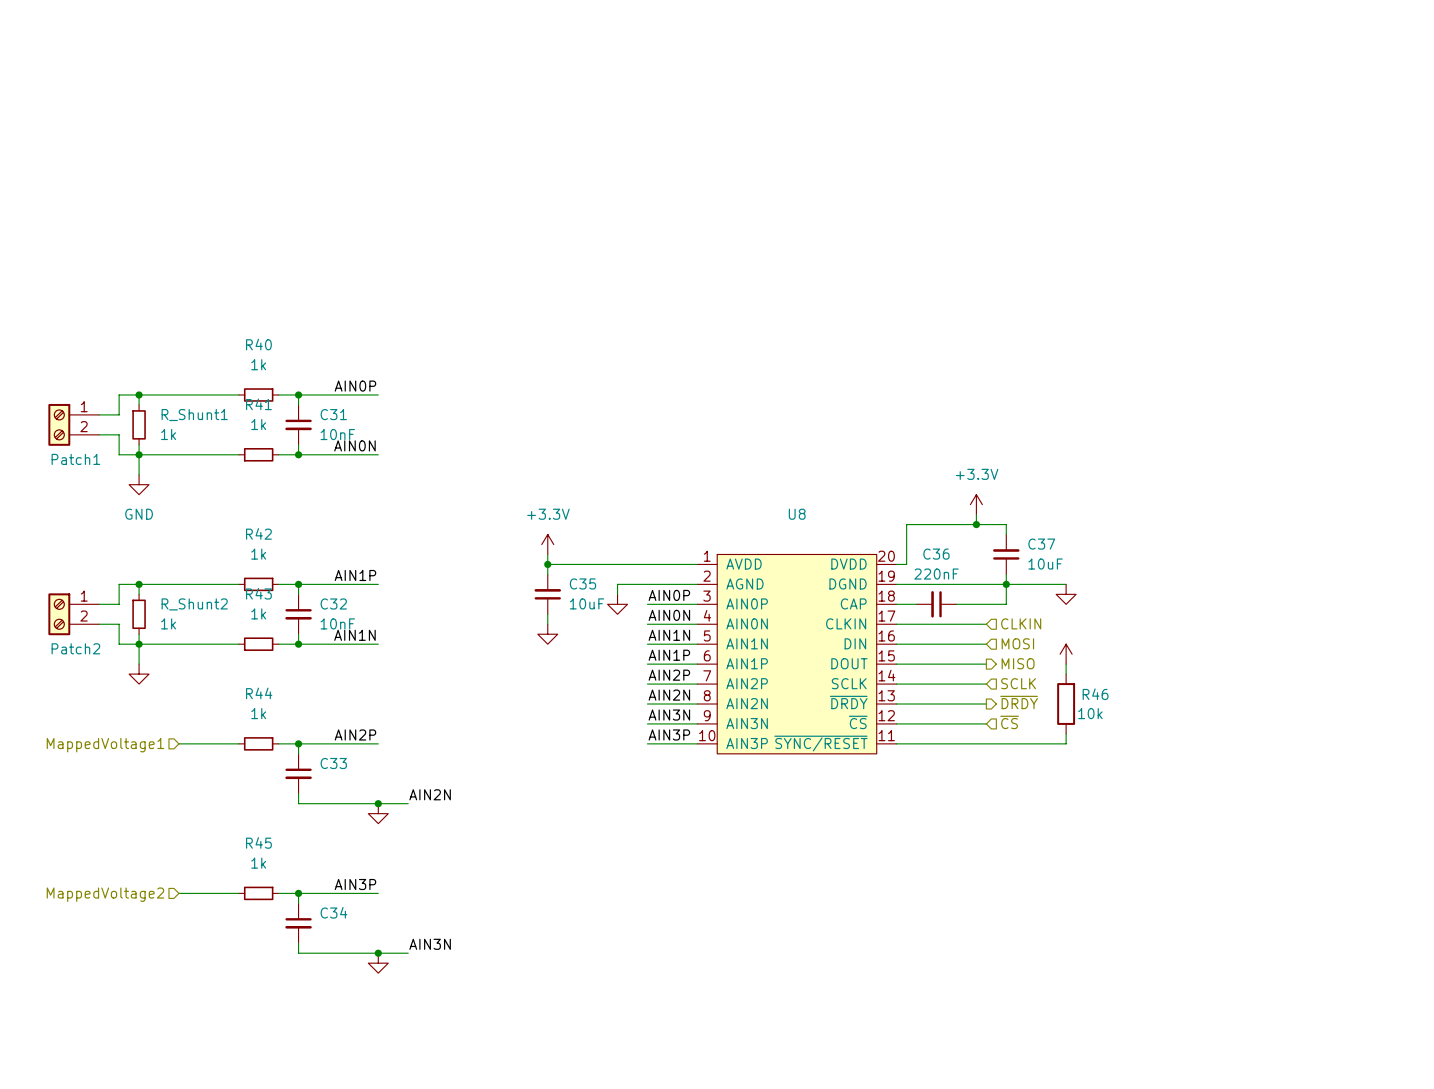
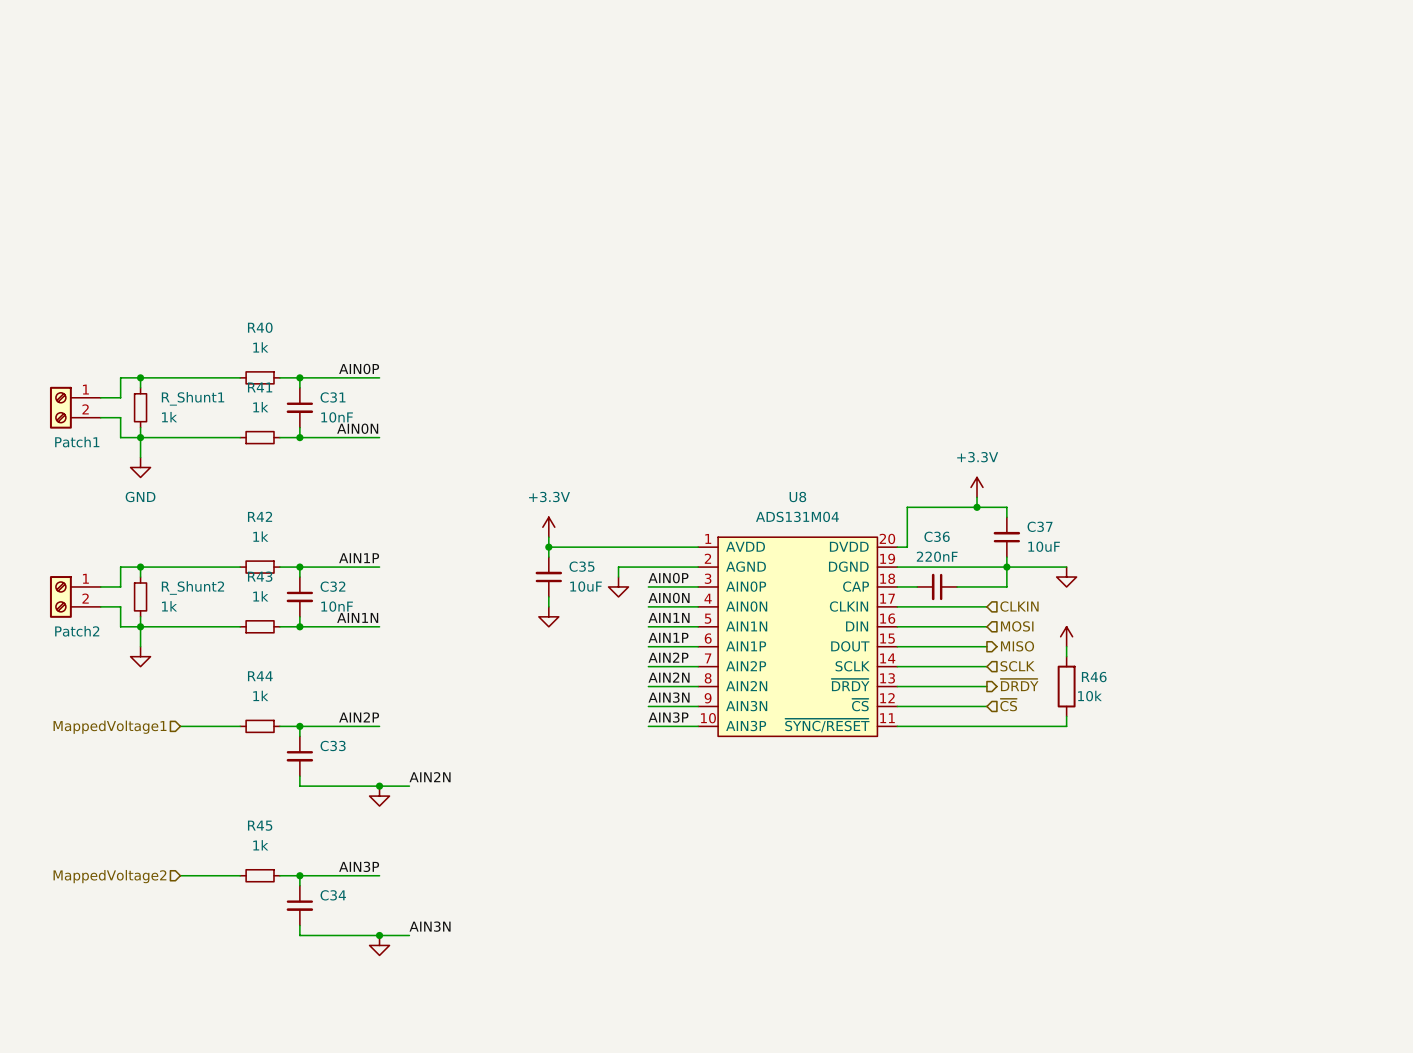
U8 value: none -> ADS131M04 (797, 516)

